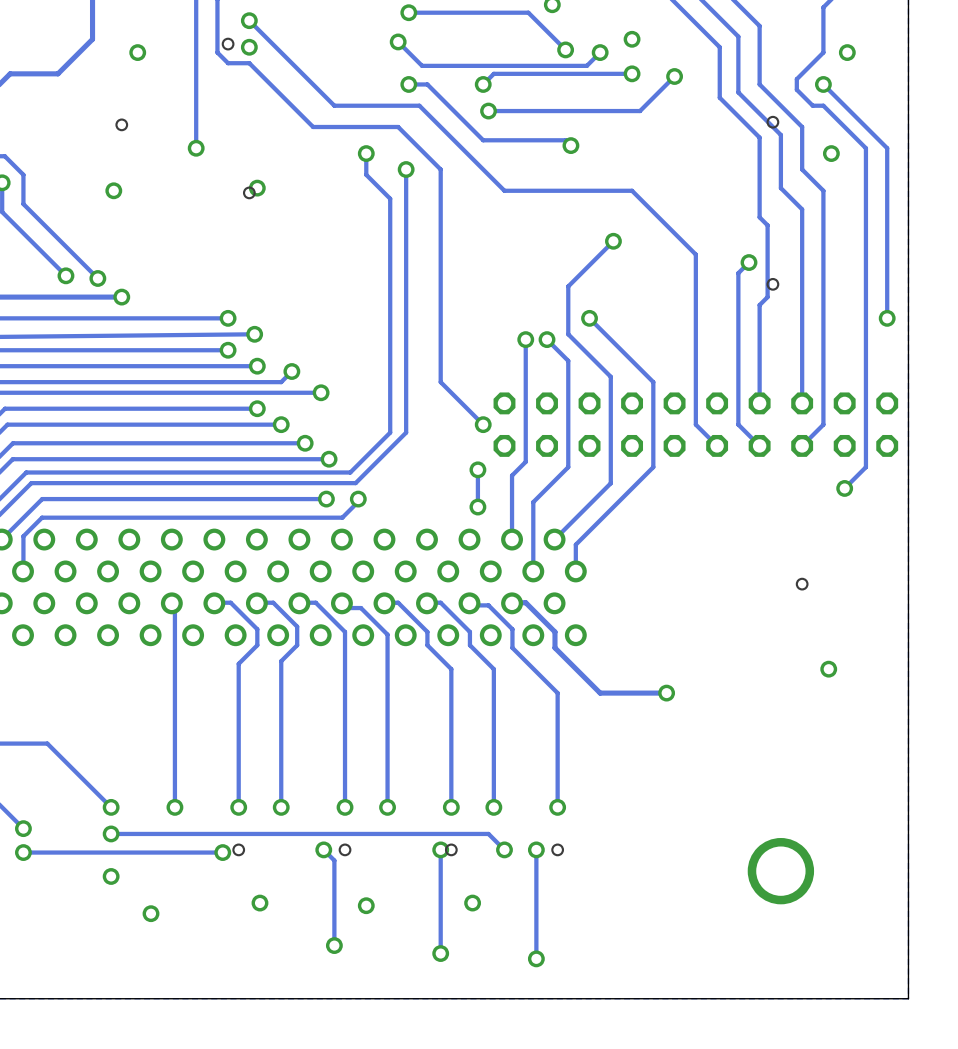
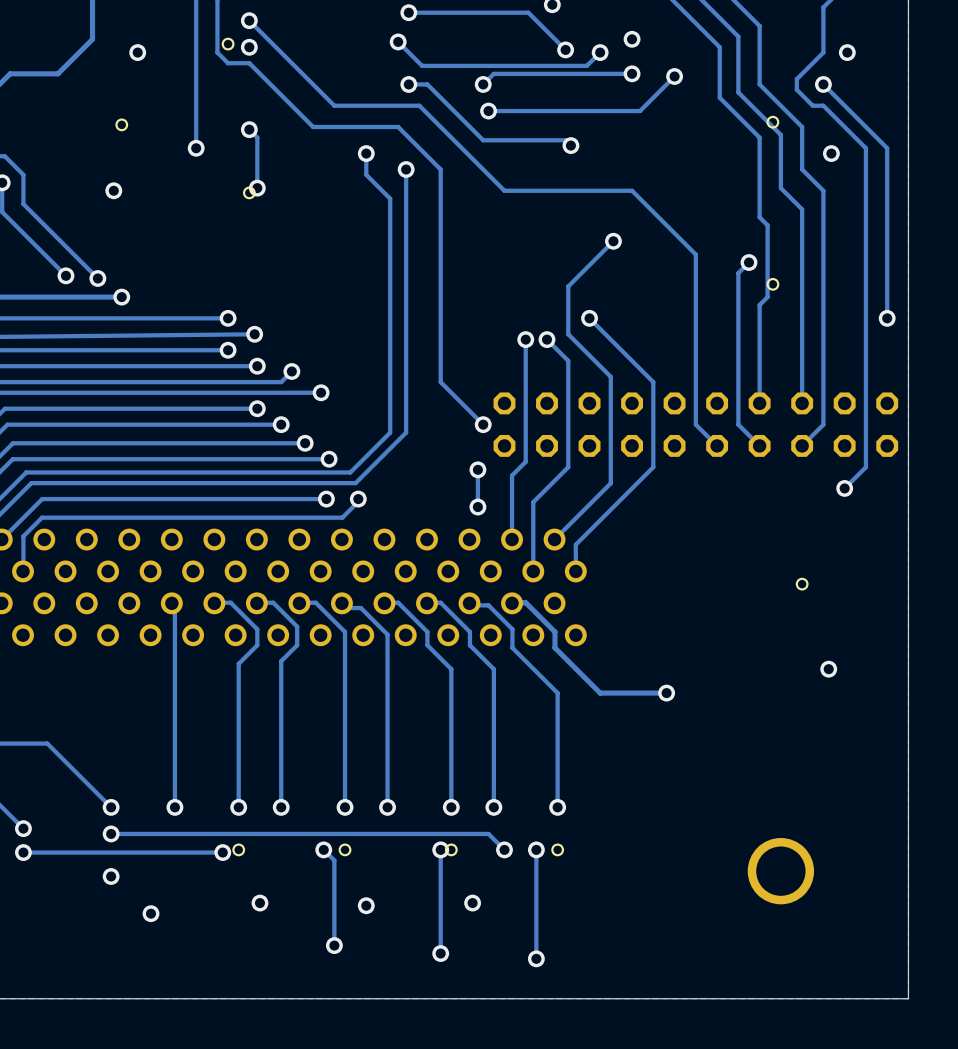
track: none -> (249, 129) (257, 137) (257, 188)
via: none -> (249, 129)

